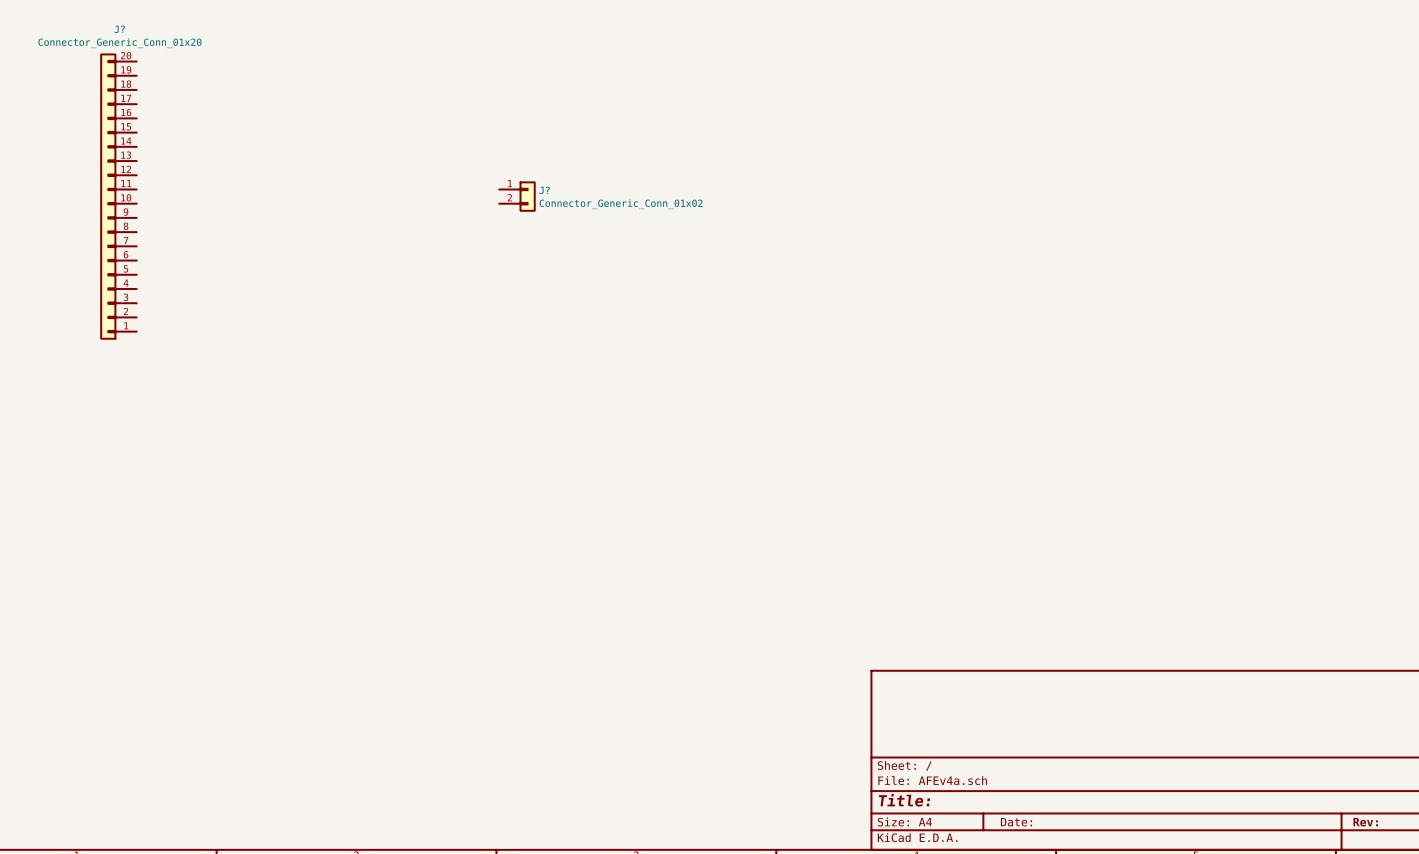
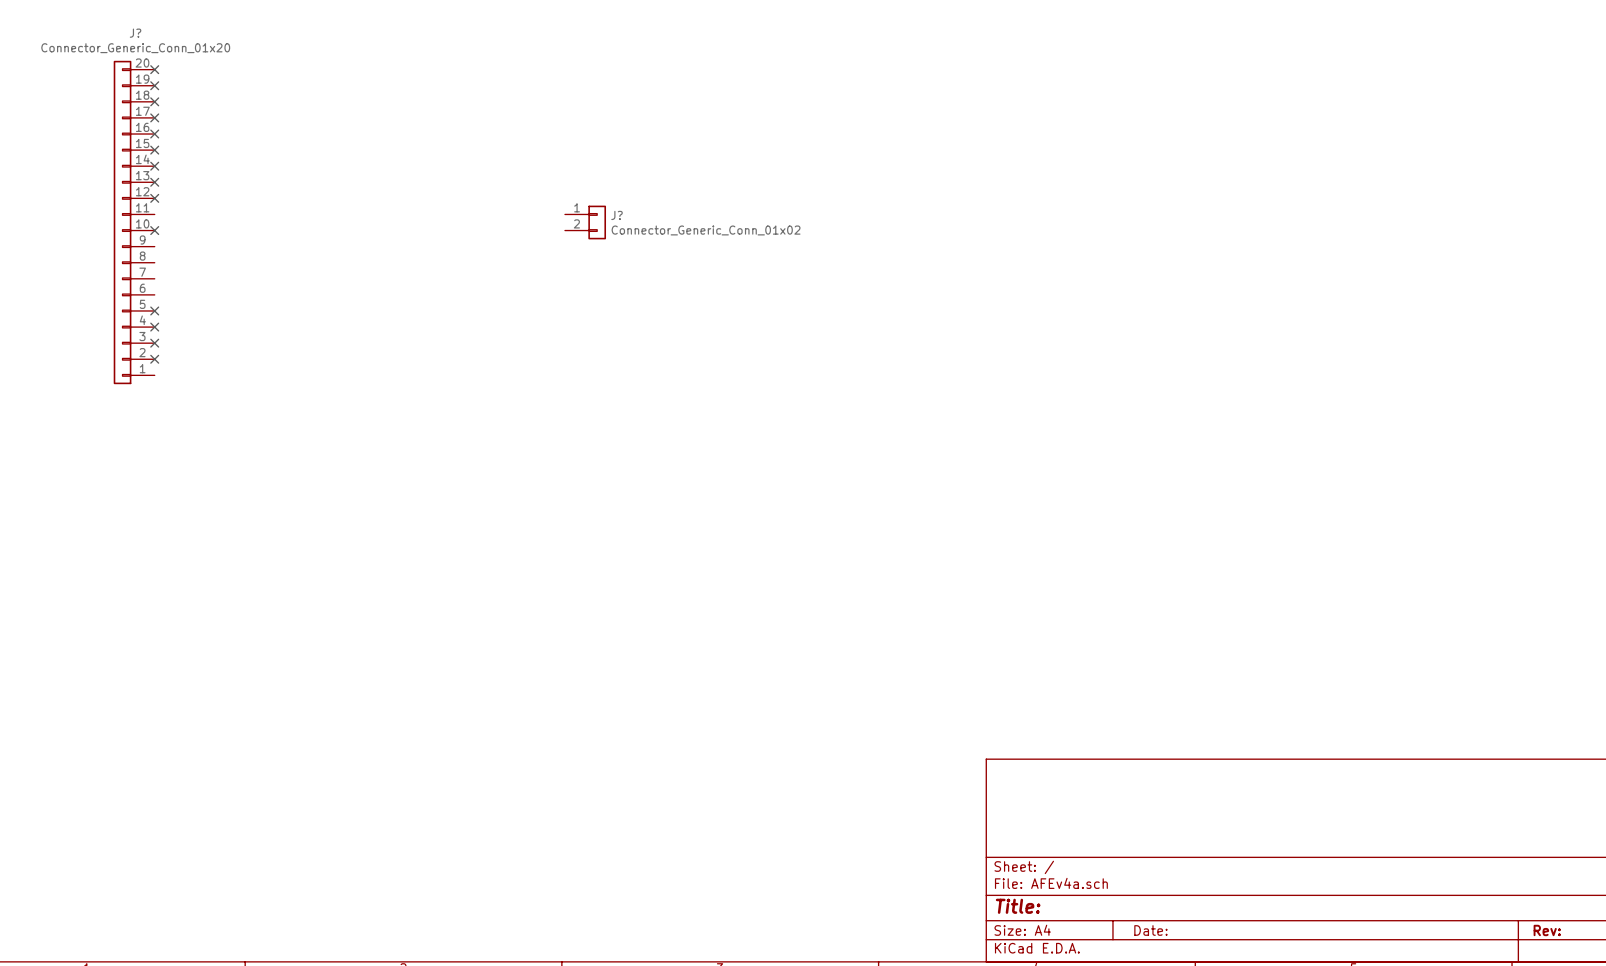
no-connect mark: none -> (154, 69)
no-connect mark: none -> (154, 85)
no-connect mark: none -> (154, 101)
no-connect mark: none -> (154, 117)
no-connect mark: none -> (154, 134)
no-connect mark: none -> (154, 150)
no-connect mark: none -> (154, 166)
no-connect mark: none -> (154, 182)
no-connect mark: none -> (154, 198)
no-connect mark: none -> (154, 230)
no-connect mark: none -> (154, 310)
no-connect mark: none -> (154, 327)
no-connect mark: none -> (154, 343)
no-connect mark: none -> (154, 359)

